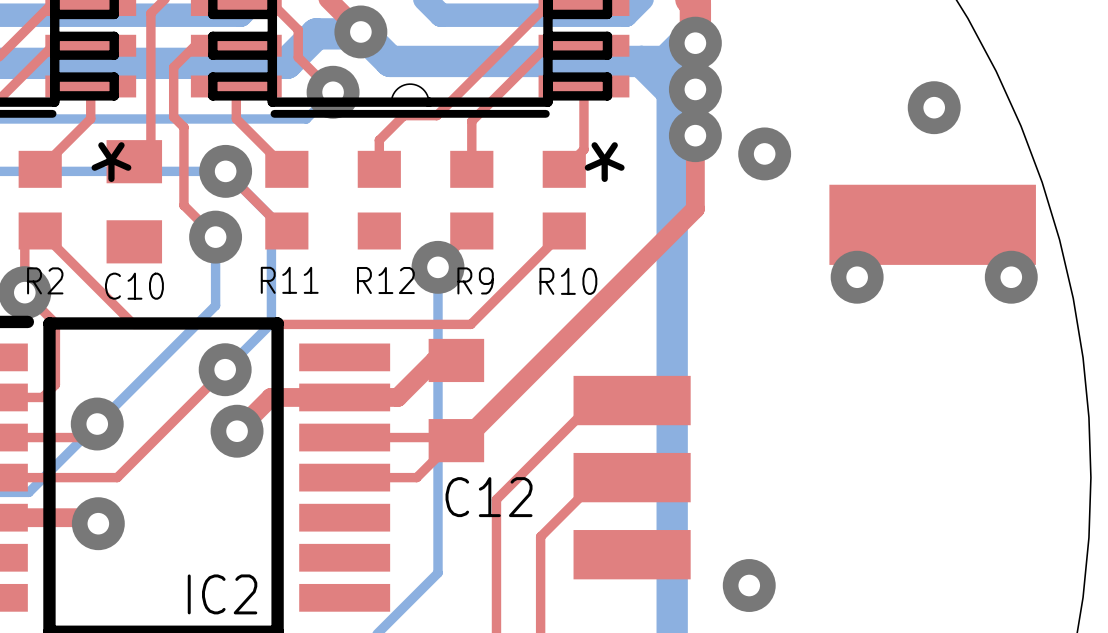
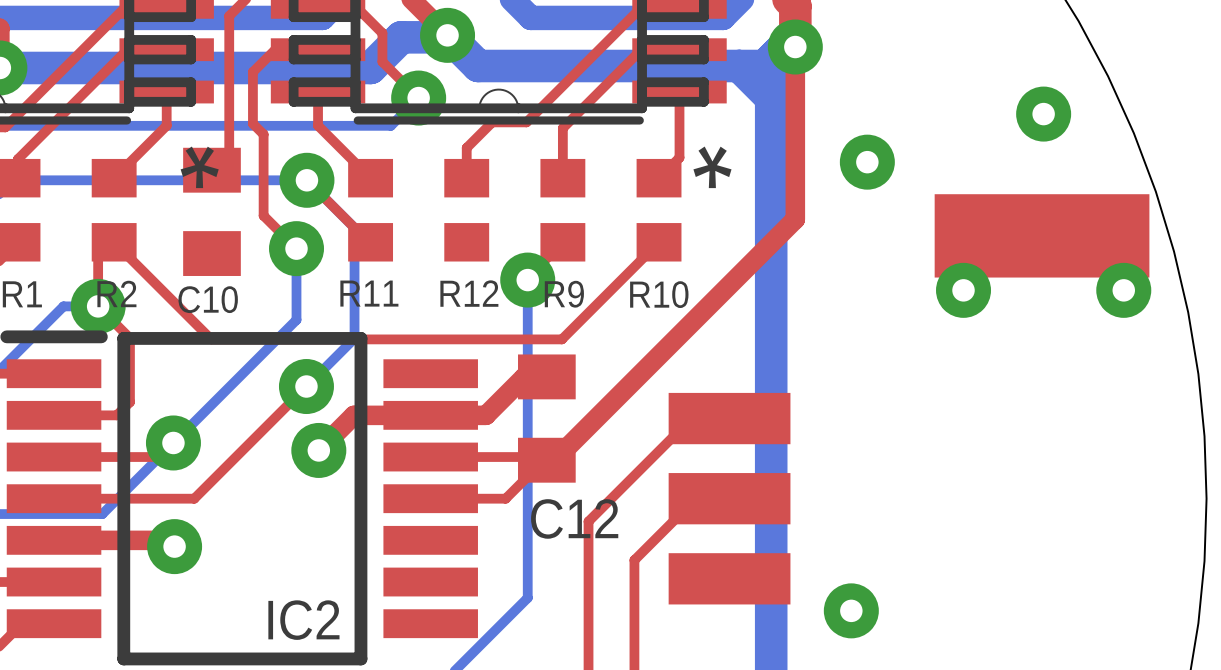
via: (695, 89) -> none
via: (695, 135) -> none

